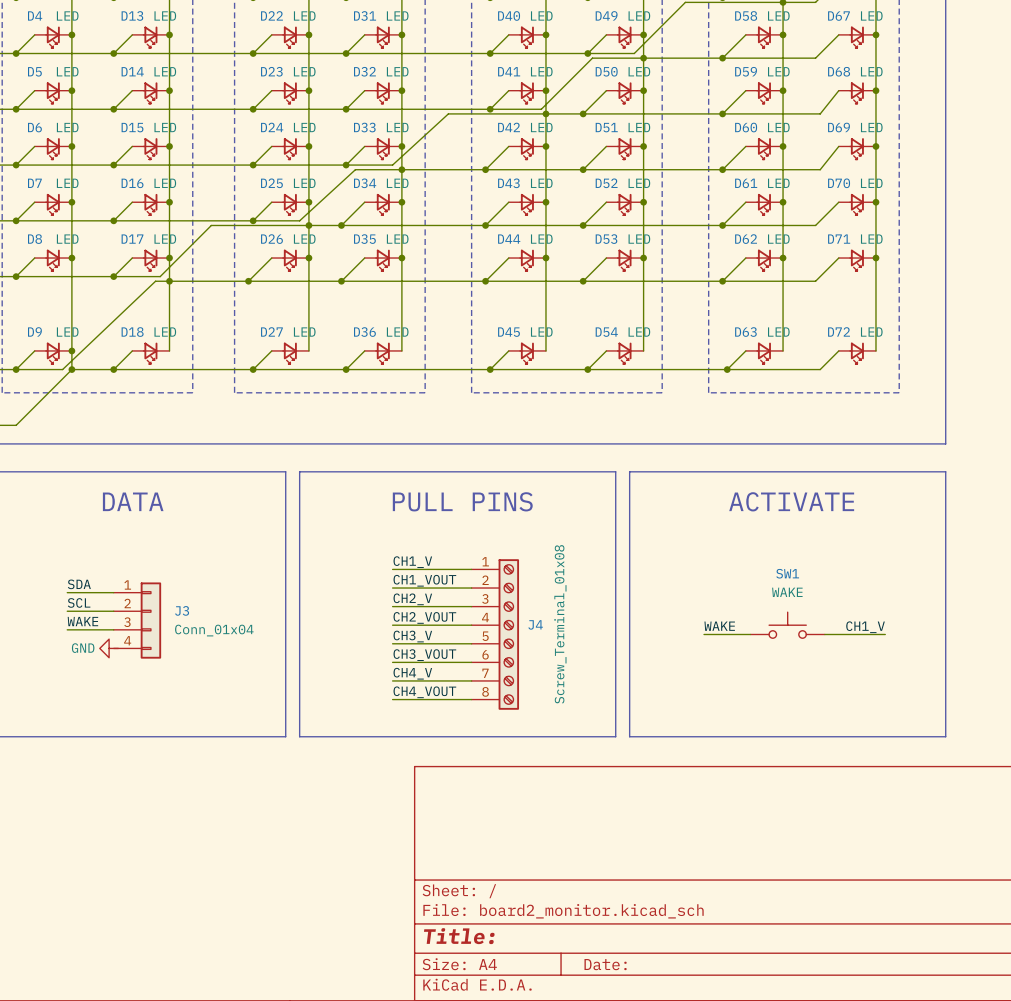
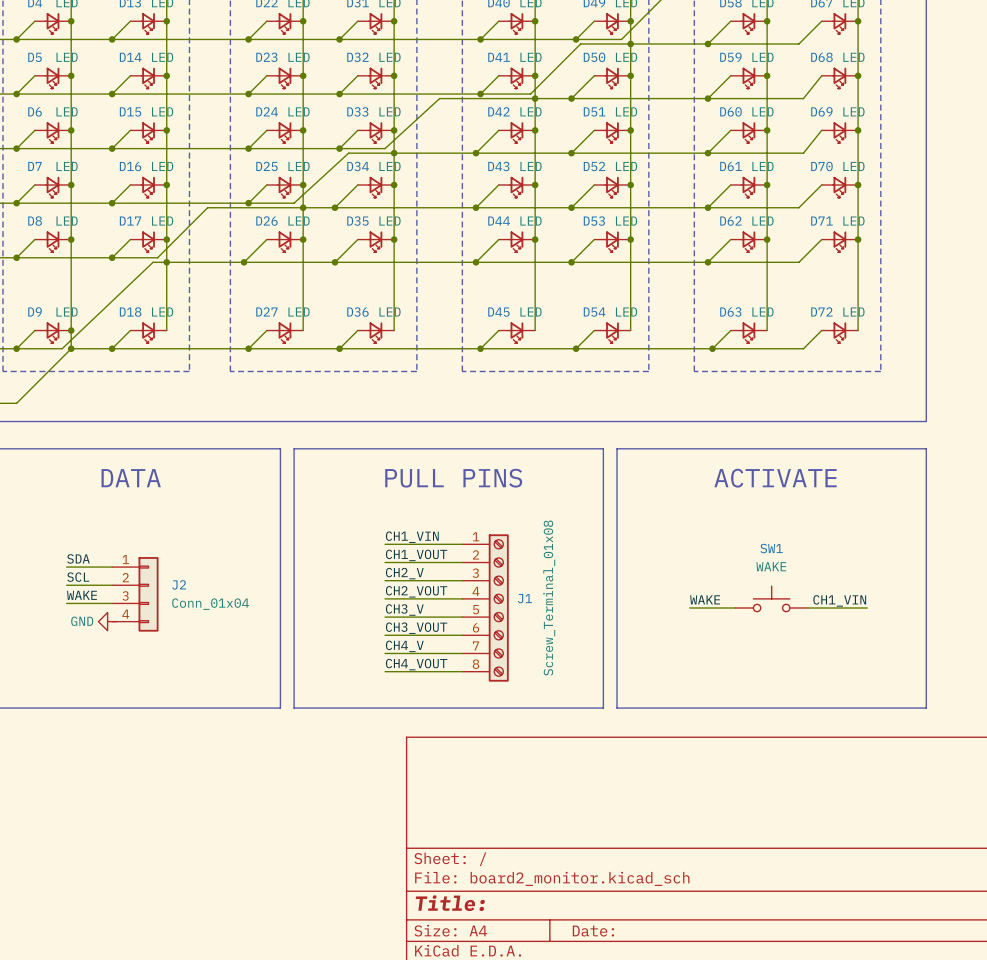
label: CH1_V (412, 562) -> CH1_VIN (412, 537)
J3 name: J3 (182, 610) -> J2 (179, 584)
J4 name: J4 (535, 624) -> J1 (524, 598)
label: CH1_V (865, 627) -> CH1_VIN (839, 600)

